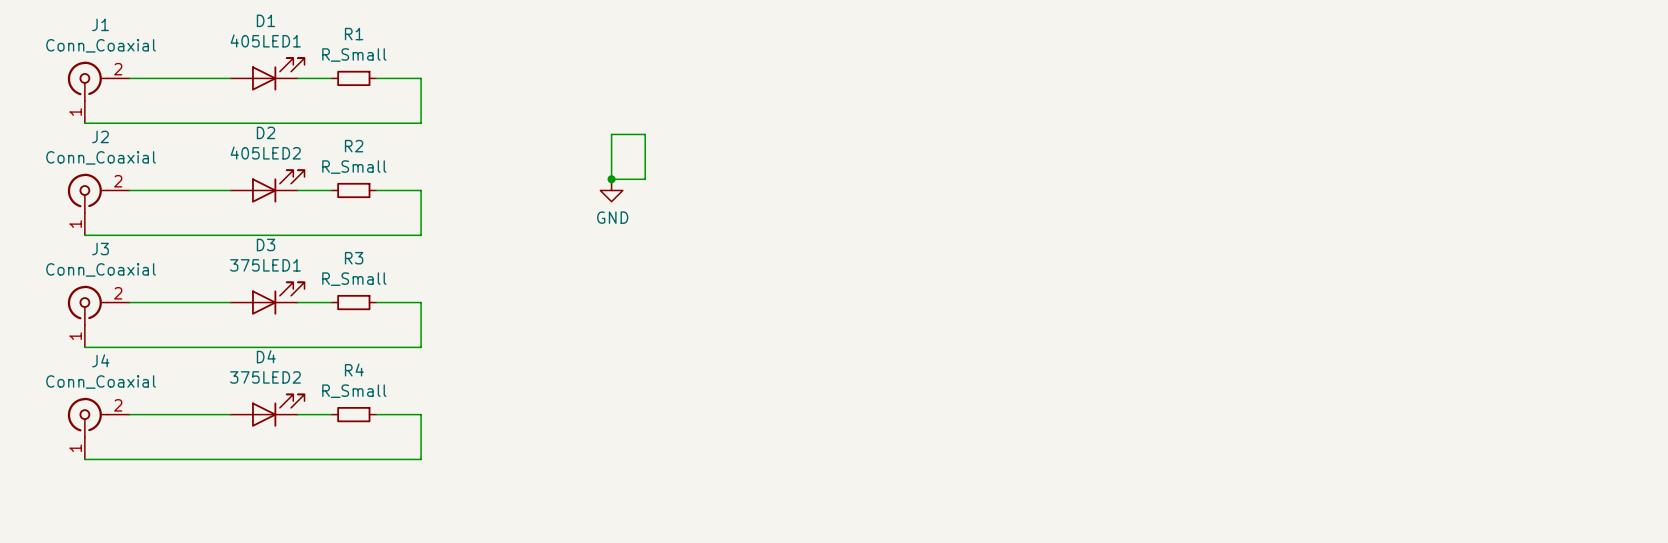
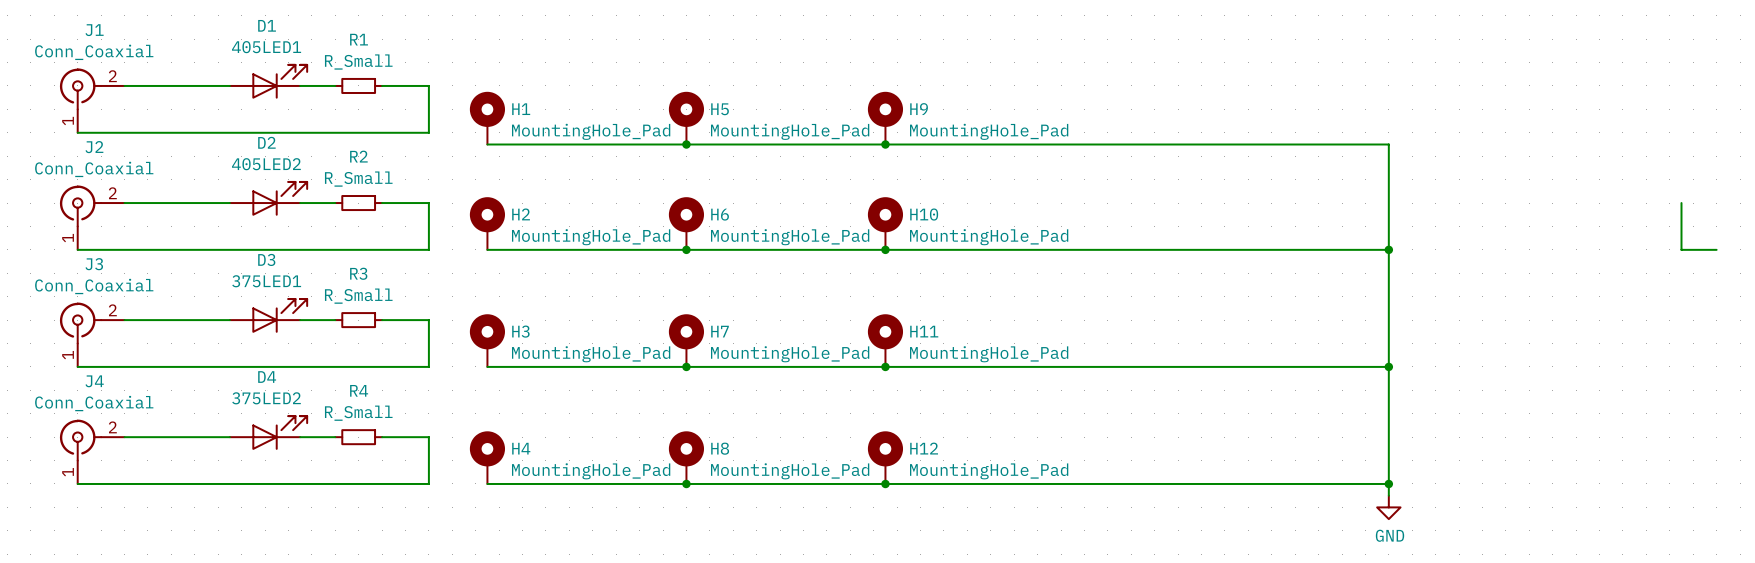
H1: none -> MountingHole_Pad (487, 118)
H5: none -> MountingHole_Pad (686, 118)
H9: none -> MountingHole_Pad (885, 118)
wire: (611, 134) (611, 179) (645, 179) (645, 134) -> (627, 144) (487, 144)
wire: none -> (663, 144) (1388, 144) (1388, 495)
junction: none -> (686, 144)
junction: none -> (885, 144)
junction: (611, 179) -> none
power symbol: GND (611, 190) -> none
wire: none -> (1681, 203) (1681, 249) (1716, 249)
H2: none -> MountingHole_Pad (487, 223)
H6: none -> MountingHole_Pad (686, 223)
H10: none -> MountingHole_Pad (885, 223)
wire: none -> (487, 249) (1388, 249)
junction: none -> (686, 249)
junction: none -> (885, 249)
junction: none -> (1388, 249)
H3: none -> MountingHole_Pad (487, 340)
H7: none -> MountingHole_Pad (686, 340)
H11: none -> MountingHole_Pad (885, 340)
wire: none -> (487, 366) (1388, 366)
junction: none -> (686, 366)
junction: none -> (885, 366)
junction: none -> (1388, 366)
H4: none -> MountingHole_Pad (487, 457)
H8: none -> MountingHole_Pad (686, 457)
H12: none -> MountingHole_Pad (885, 457)
wire: none -> (487, 483) (1388, 483)
junction: none -> (686, 483)
junction: none -> (885, 483)
junction: none -> (1388, 483)
power symbol: none -> GND (1388, 507)

